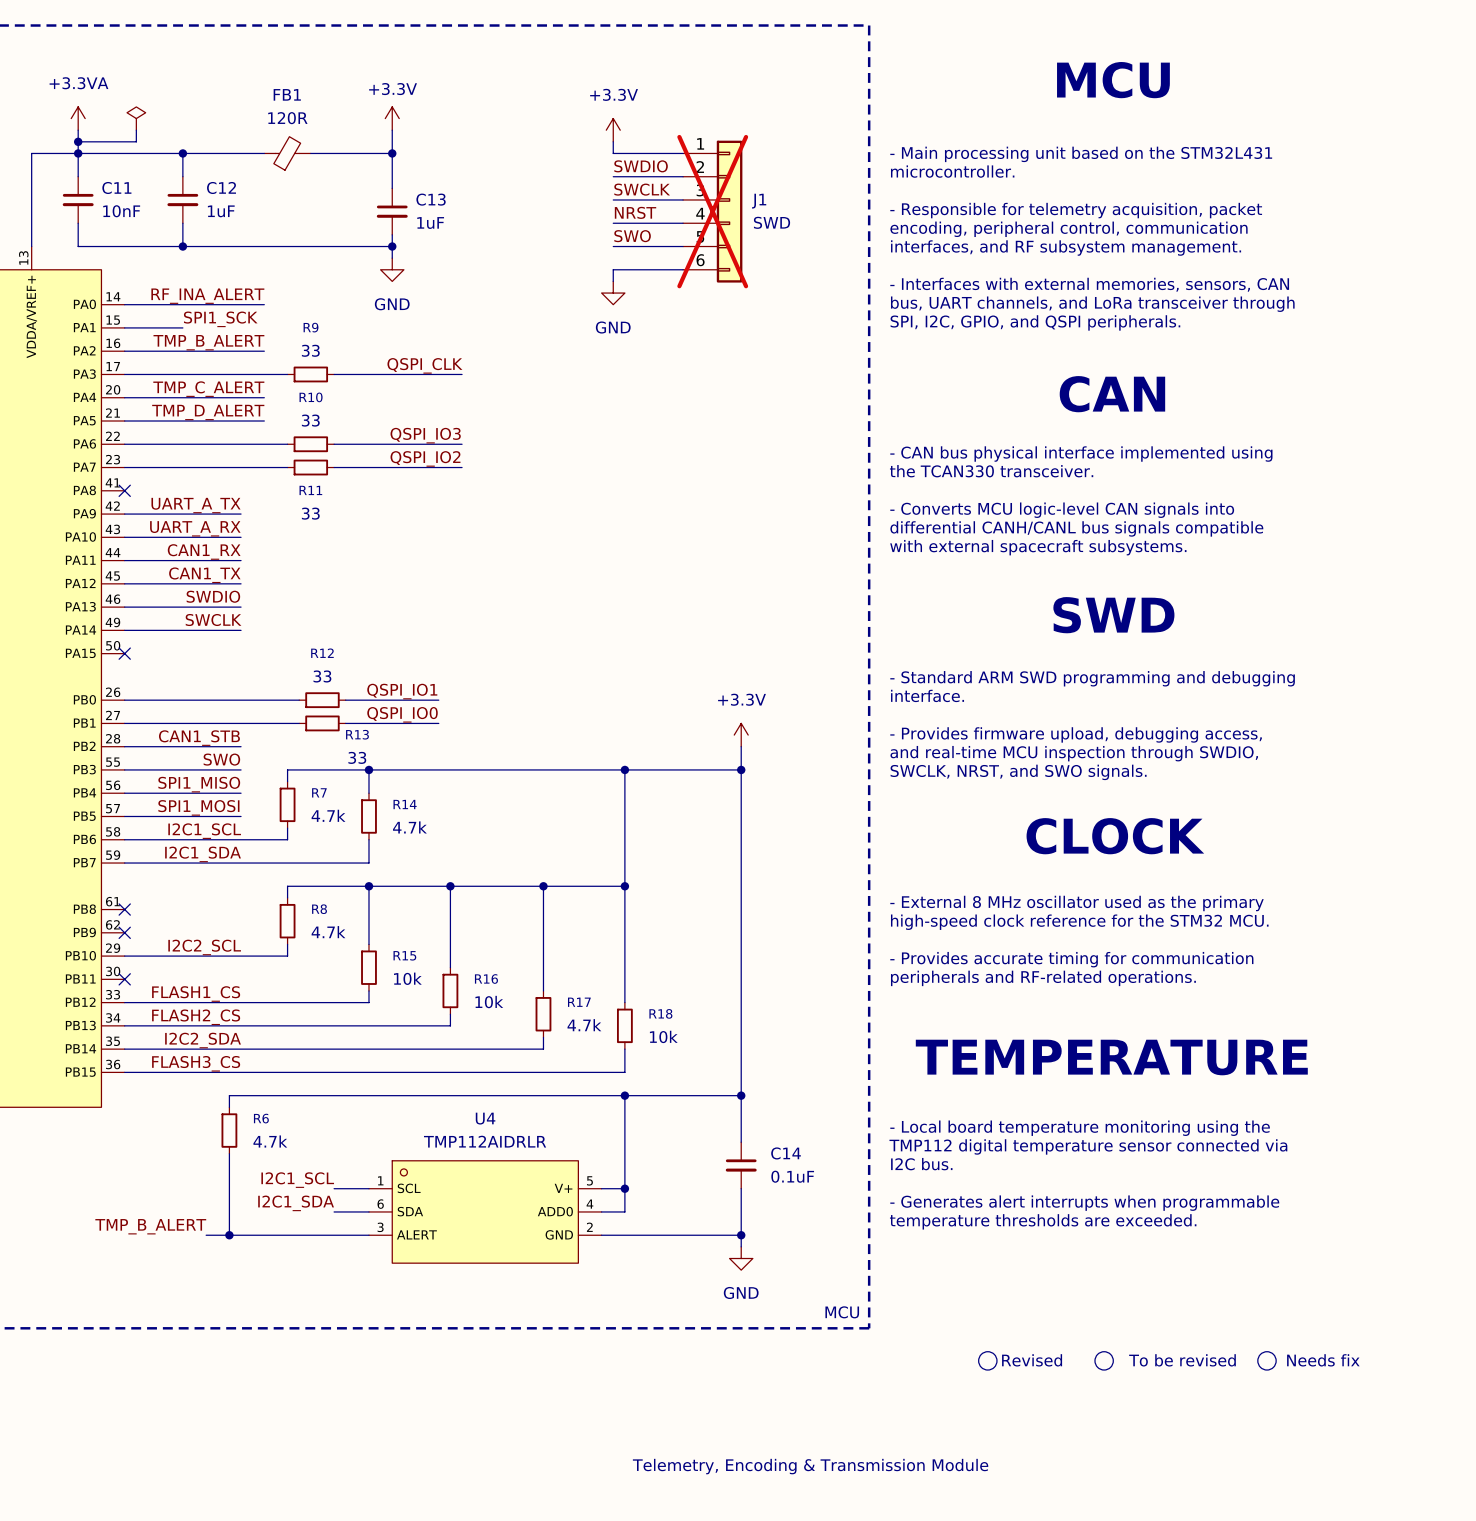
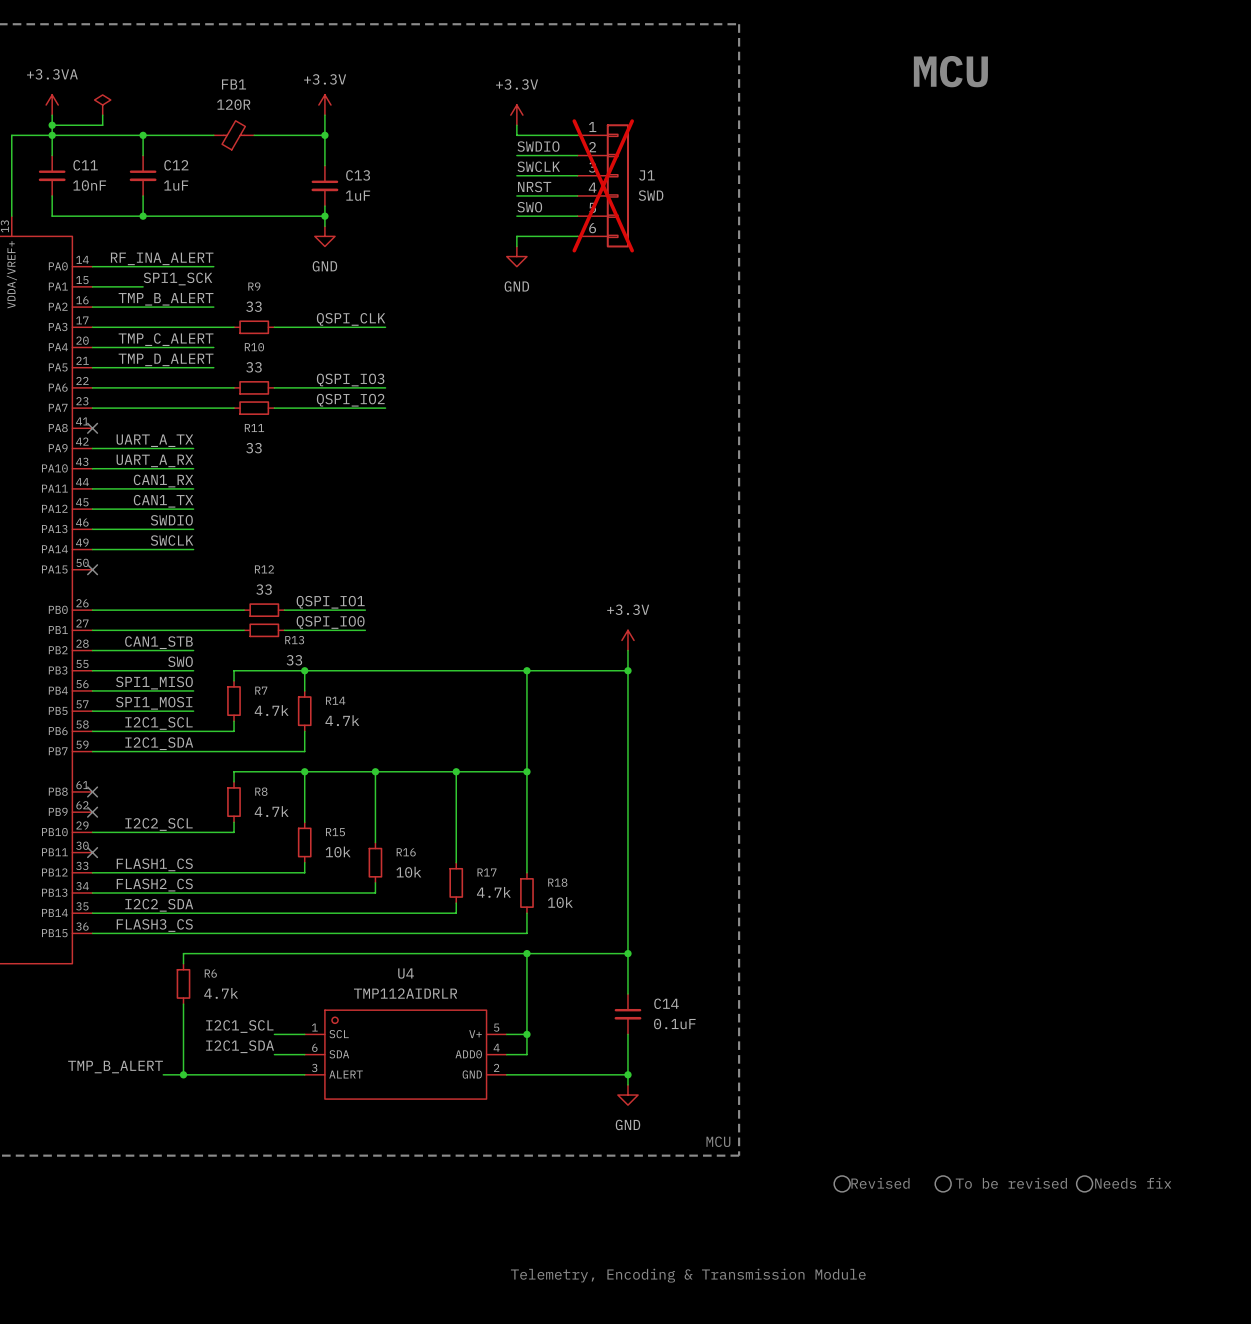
text: - Main processing unit based on the STM32L431 (1081, 154) -> none
text: microcontroller. (952, 171) -> none
text: - Responsible for telemetry acquisition, packet (1076, 210) -> none
text: encoding, peripheral control, communication (1069, 229) -> none
text: interfaces, and RF subsystem management. (1066, 248) -> none
text: - Interfaces with external memories, sensors, CAN (1089, 284) -> none
text: bus, UART channels, and LoRa transceiver through (1092, 304) -> none
text: SPI, I2C, GPIO, and QSPI peripherals. (1035, 322) -> none
text: CAN (1112, 394) -> none
text: - CAN bus physical interface implemented using (1081, 454) -> none
text: the TCAN330 transceiver. (991, 471) -> none
text: - Converts MCU logic-level CAN signals into (1062, 510) -> none
text: differential CANH/CANL bus signals compatible (1076, 528) -> none
text: with external spacecraft subsystems. (1038, 547) -> none
text: SWD (1113, 615) -> none
text: - Standard ARM SWD programming and debugging (1092, 678) -> none
text: interface. (927, 695) -> none
text: - Provides firmware upload, debugging access, (1076, 734) -> none
text: and real-time MCU inspection through SWDIO, (1074, 753) -> none
text: SWCLK, NRST, and SWO signals. (1018, 772) -> none
text: CLOCK (1115, 836) -> none
text: - External 8 MHz oscillator used as the primary (1077, 903) -> none
text: high-speed clock reference for the STM32 MCU. (1079, 922) -> none
text: - Provides accurate timing for communication (1071, 959) -> none
text: peripherals and RF-related operations. (1043, 978) -> none
text: TEMPERATURE (1111, 1057) -> none
text: - Local board temperature monitoring using the (1080, 1128) -> none
text: TMP112 digital temperature sensor connected via (1088, 1146) -> none
text: I2C bus. (921, 1164) -> none
text: - Generates alert interrupts when programmable (1084, 1203) -> none
text: temperature thresholds are exceeded. (1043, 1221) -> none

